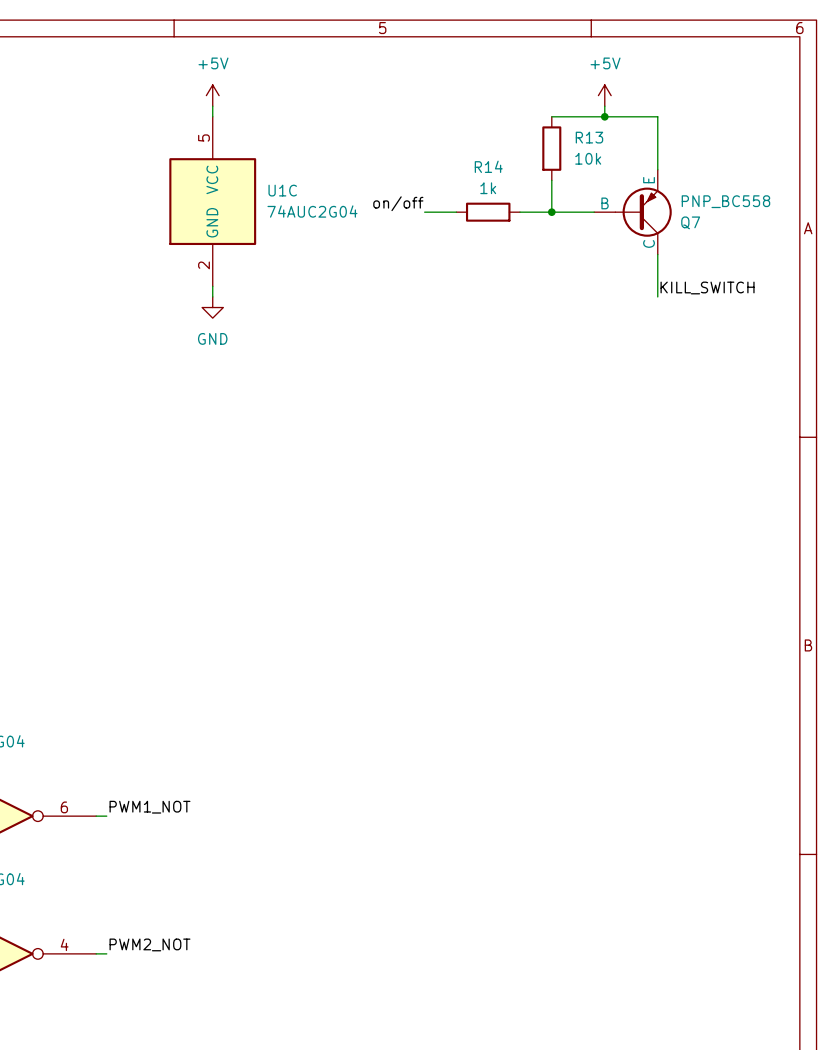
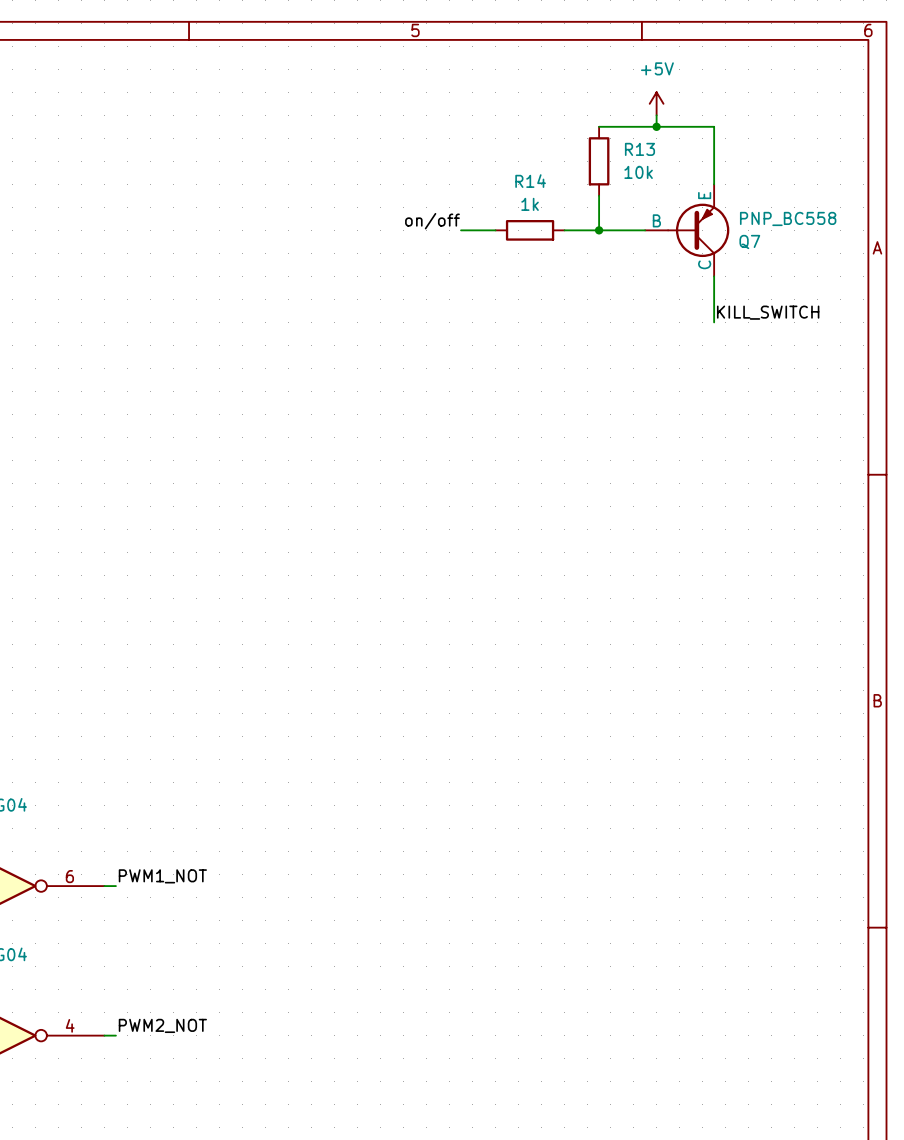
power symbol: +5V (212, 95) -> none
wire: (212, 106) (212, 116) -> none
U1C: 74AUC2G04 (212, 201) -> none
wire: (212, 286) (212, 296) -> none
power symbol: GND (212, 307) -> none

